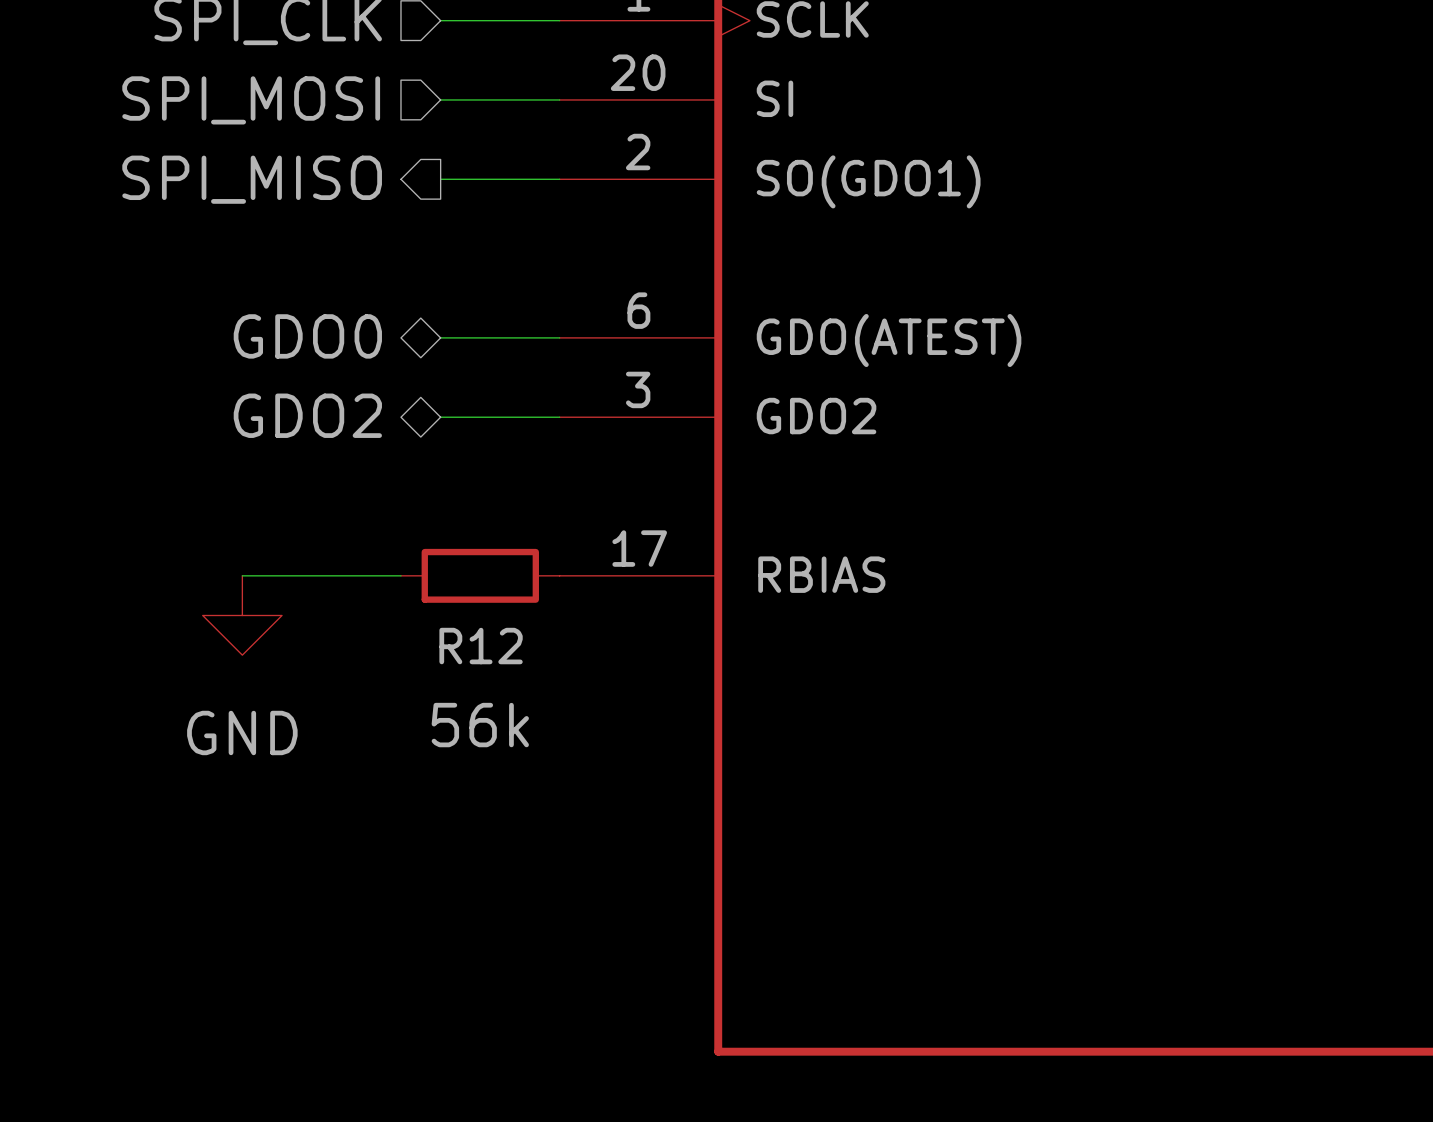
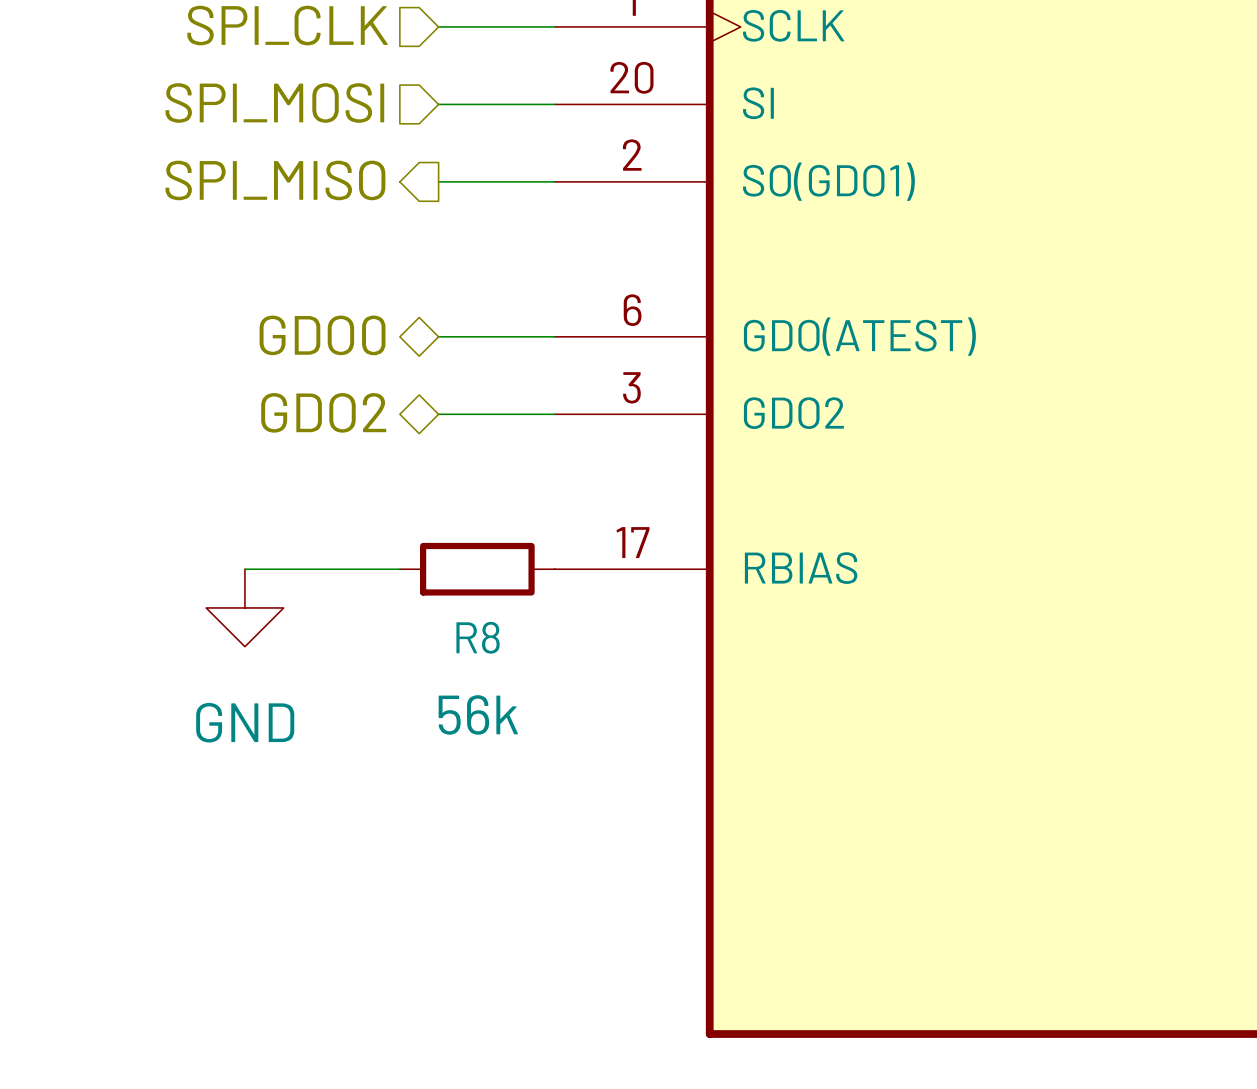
R12 name: R12 (481, 646) -> R8 (478, 637)

